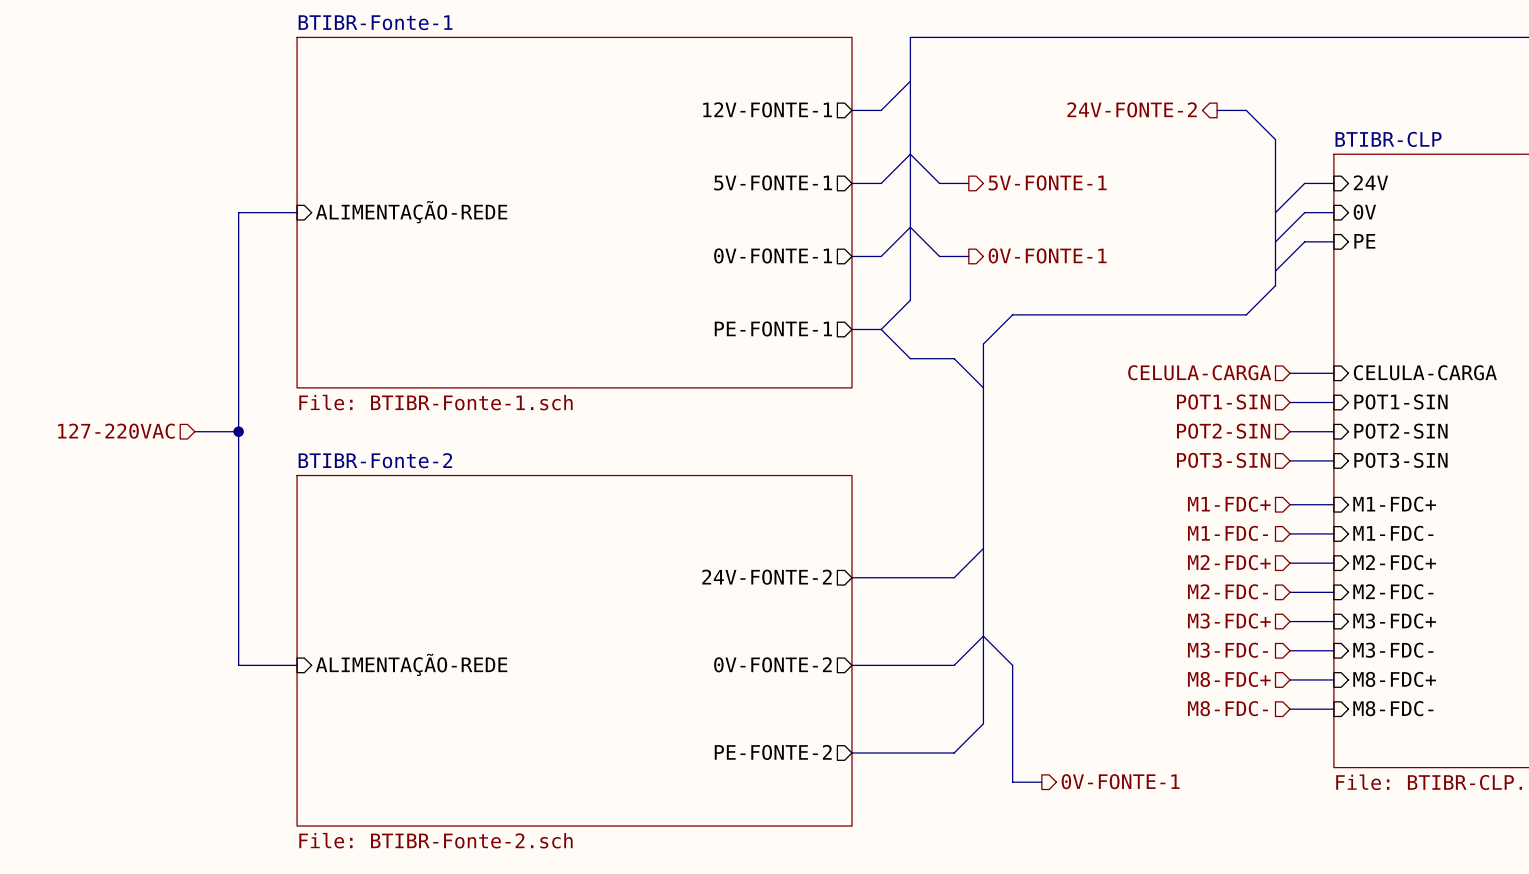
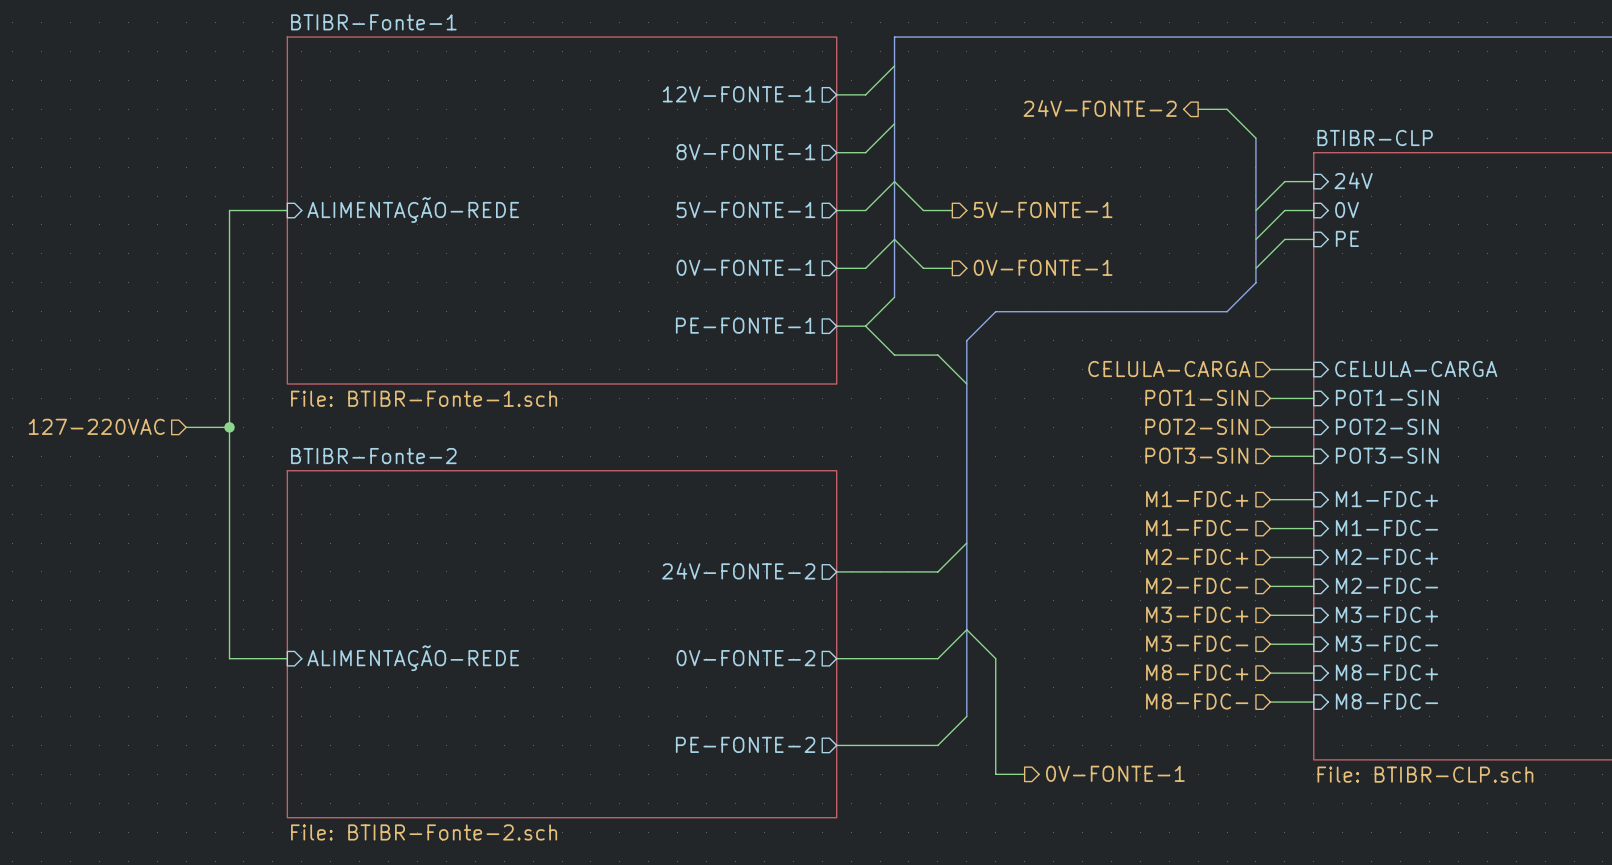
wire: (910, 81) (881, 110) (851, 110) -> (894, 65) (865, 94) (836, 94)
sheet pin position: 12V-FONTE-1 (767, 109) -> 12V-FONTE-1 (739, 94)
wire: none -> (894, 123) (865, 152) (836, 152)
sheet pin: none -> 8V-FONTE-1 (745, 152)
sheet pin position: 5V-FONTE-1 (773, 182) -> 5V-FONTE-1 (745, 209)
hierarchical label position: 5V-FONTE-1 (1047, 182) -> 5V-FONTE-1 (1043, 209)
wire: (851, 183) (881, 183) (910, 154) (939, 183) (968, 183) -> (836, 210) (865, 210) (894, 181) (923, 210) (952, 210)
sheet pin position: 0V-FONTE-1 (773, 255) -> 0V-FONTE-1 (745, 267)
hierarchical label position: 0V-FONTE-1 (1047, 255) -> 0V-FONTE-1 (1043, 267)
wire: (851, 256) (881, 256) (910, 227) (939, 256) (968, 256) -> (836, 268) (865, 268) (894, 239) (923, 268) (952, 268)

